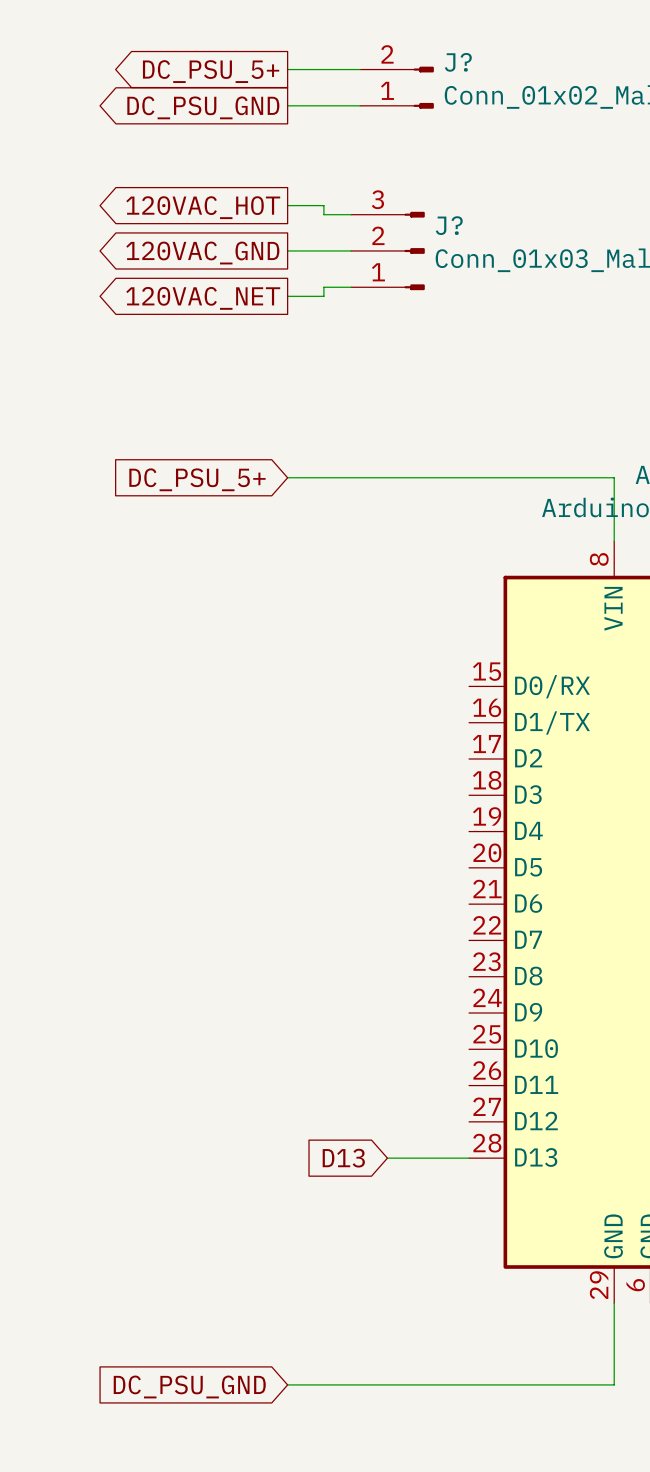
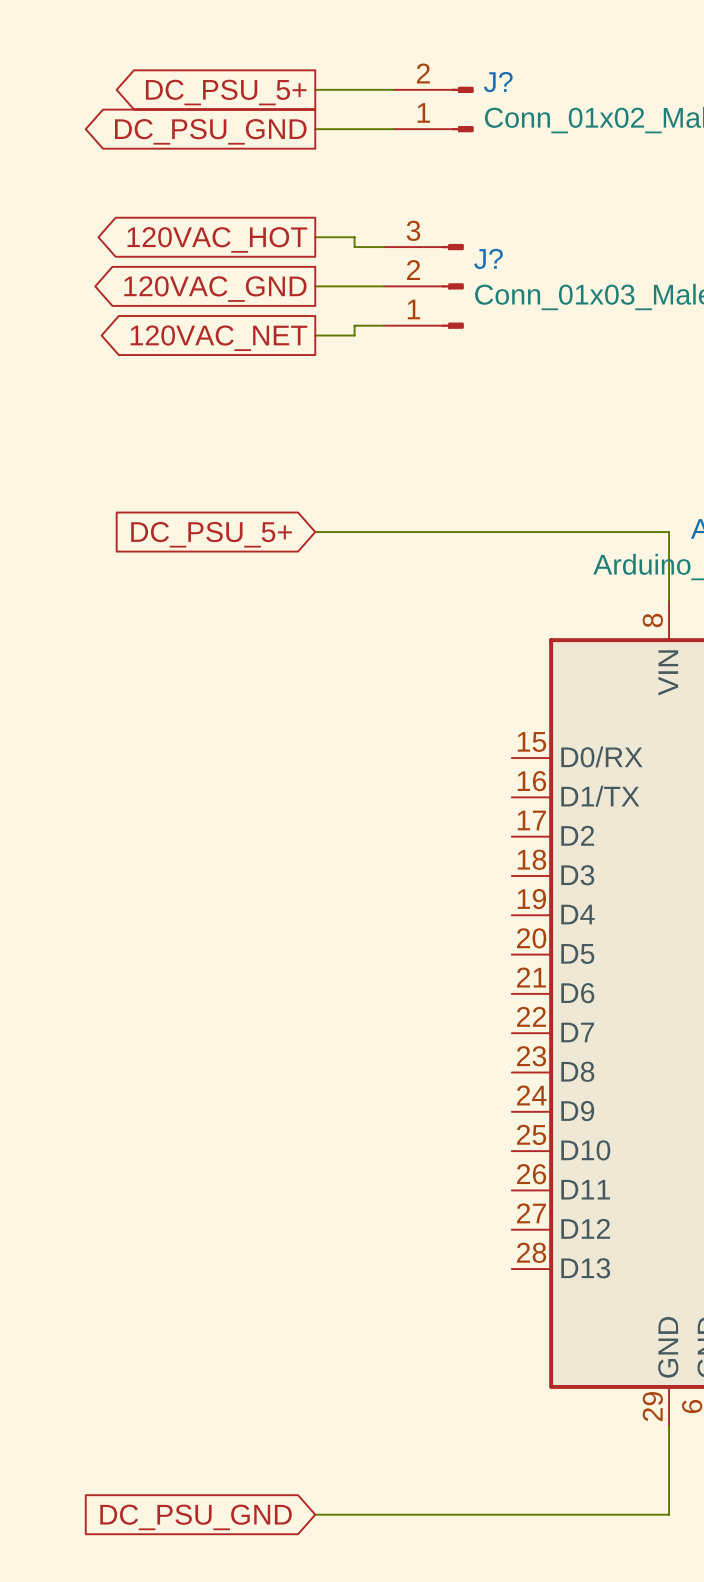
global label: D13 (343, 1158) -> none
wire: (387, 1158) (469, 1158) -> none

